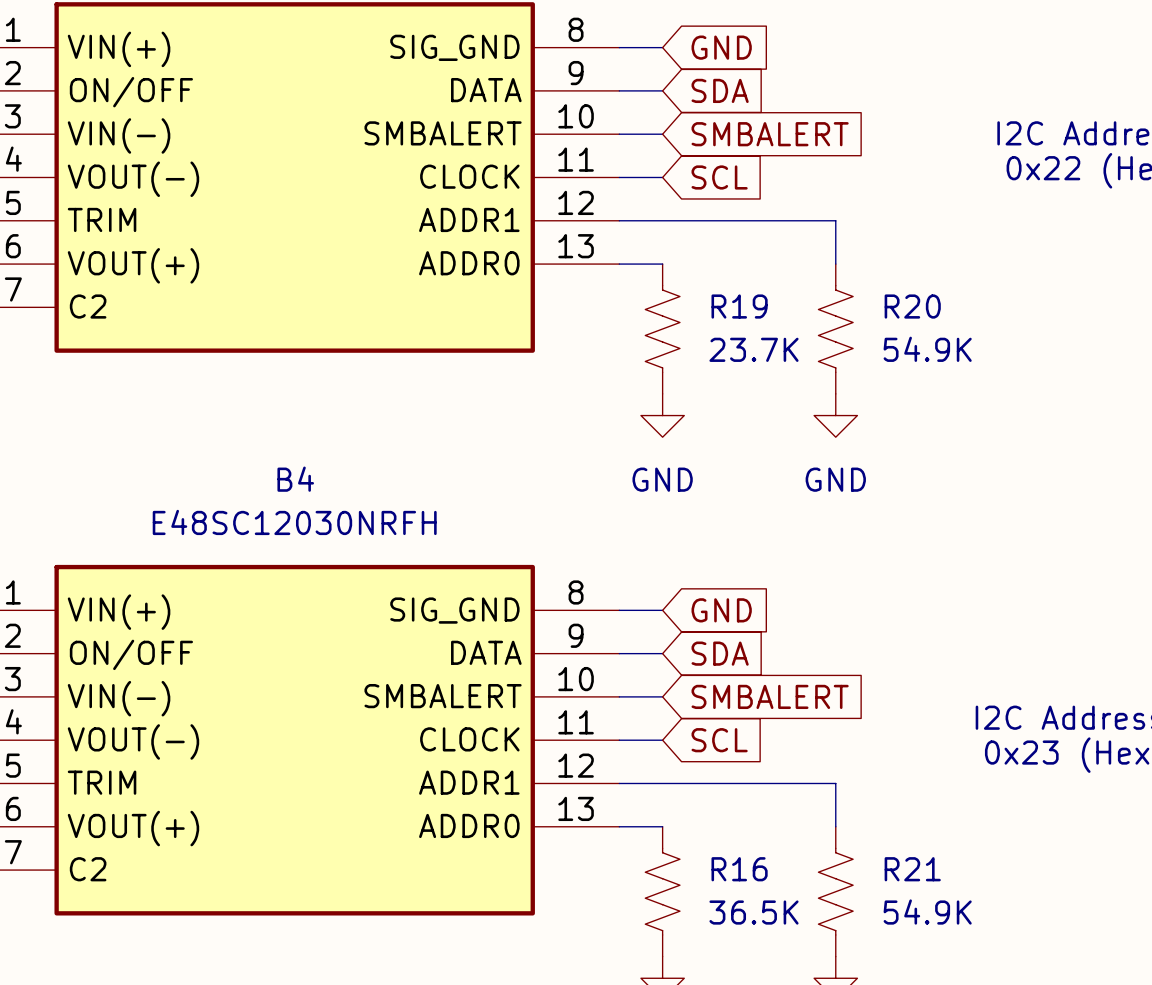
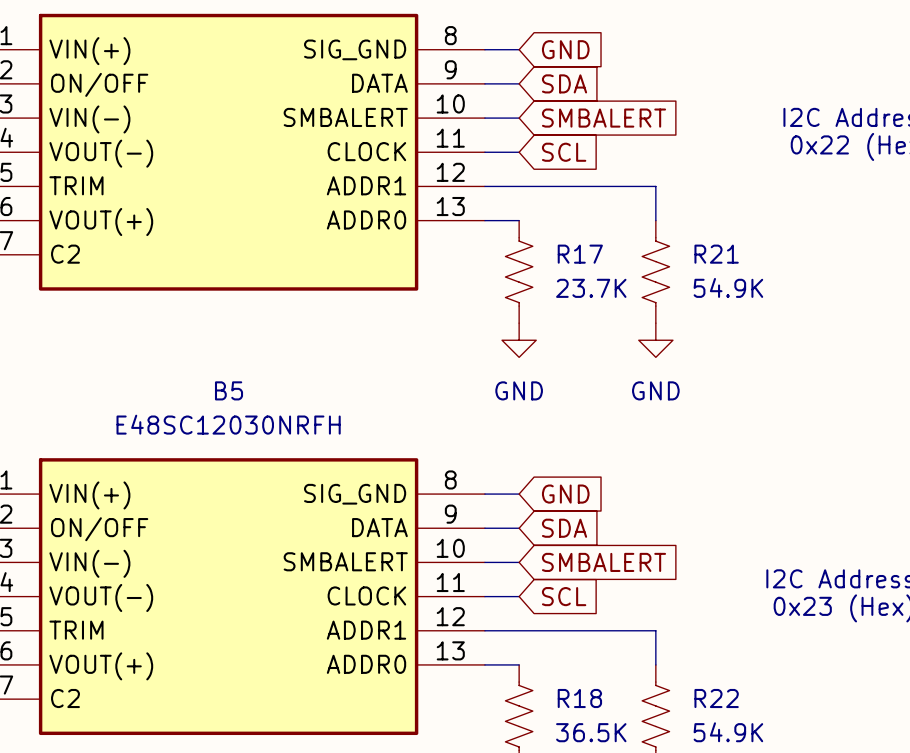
R19 name: R19 (739, 306) -> R17 (580, 254)
R20 name: R20 (912, 306) -> R21 (716, 254)
B4 name: B4 (295, 479) -> B5 (229, 390)
R16 name: R16 (739, 869) -> R18 (579, 698)
R21 name: R21 (912, 869) -> R22 (716, 698)

